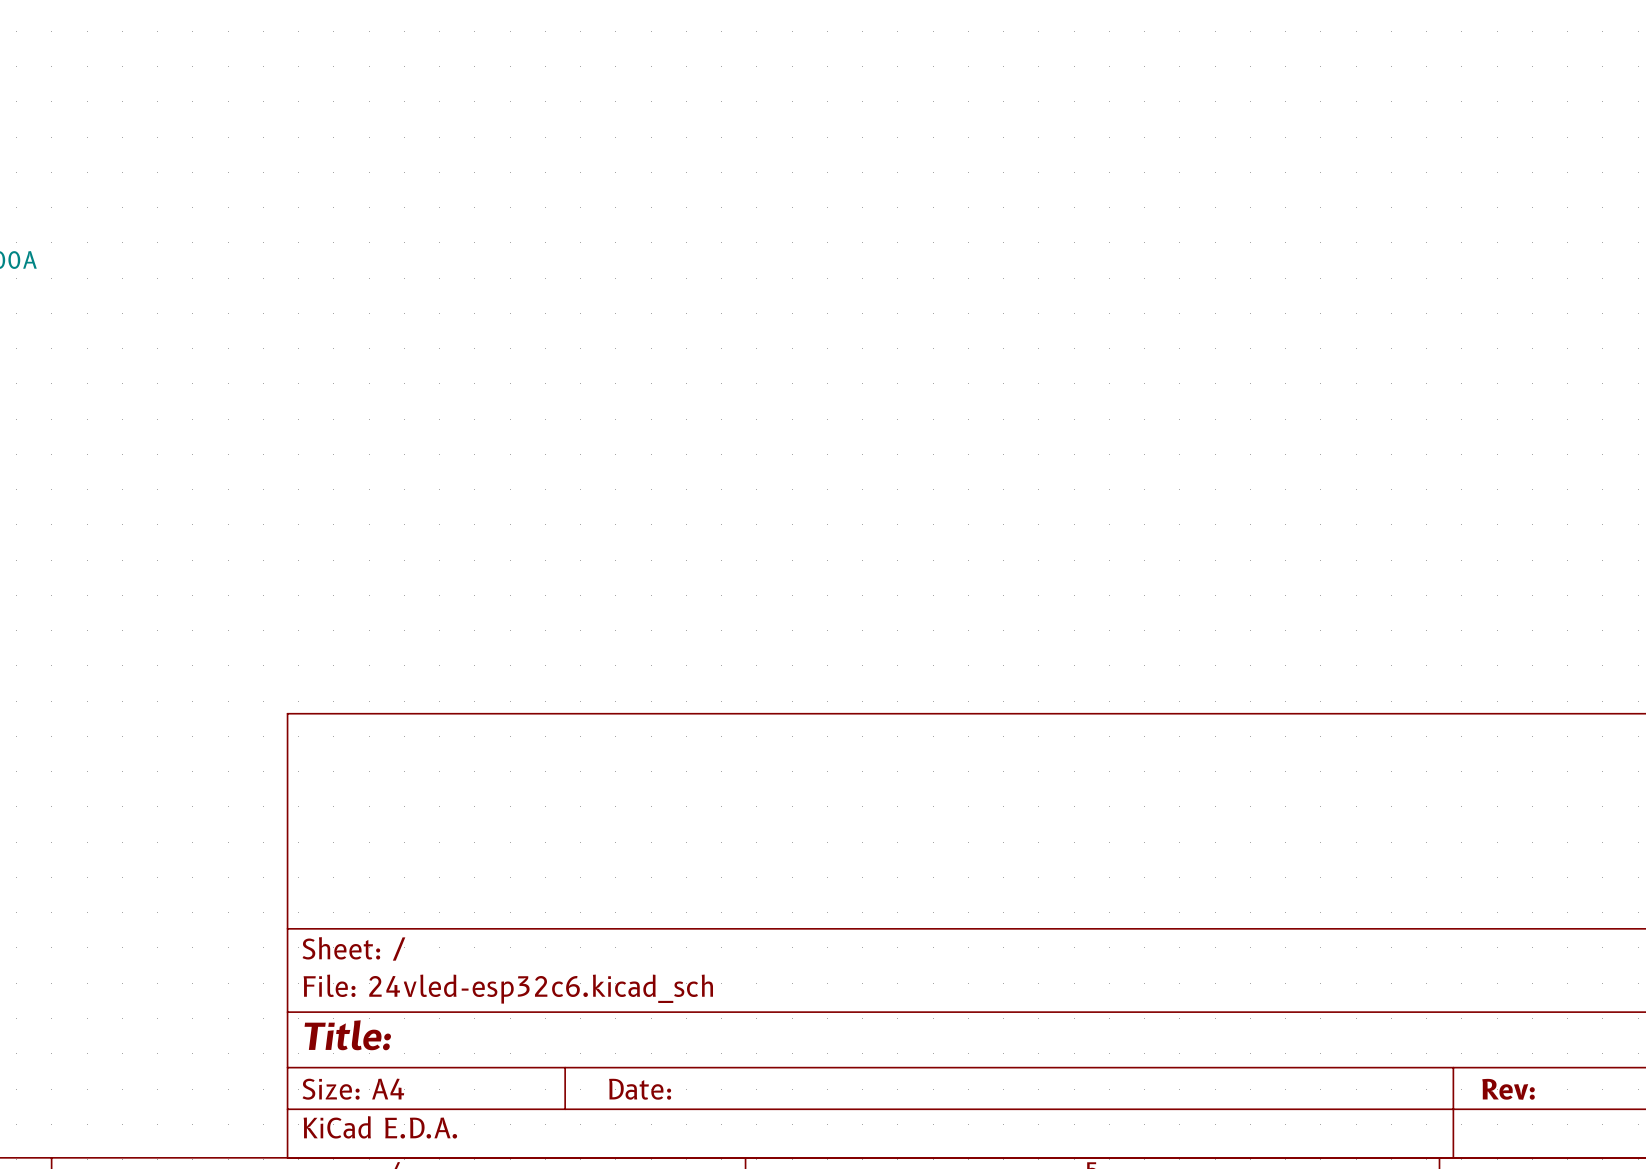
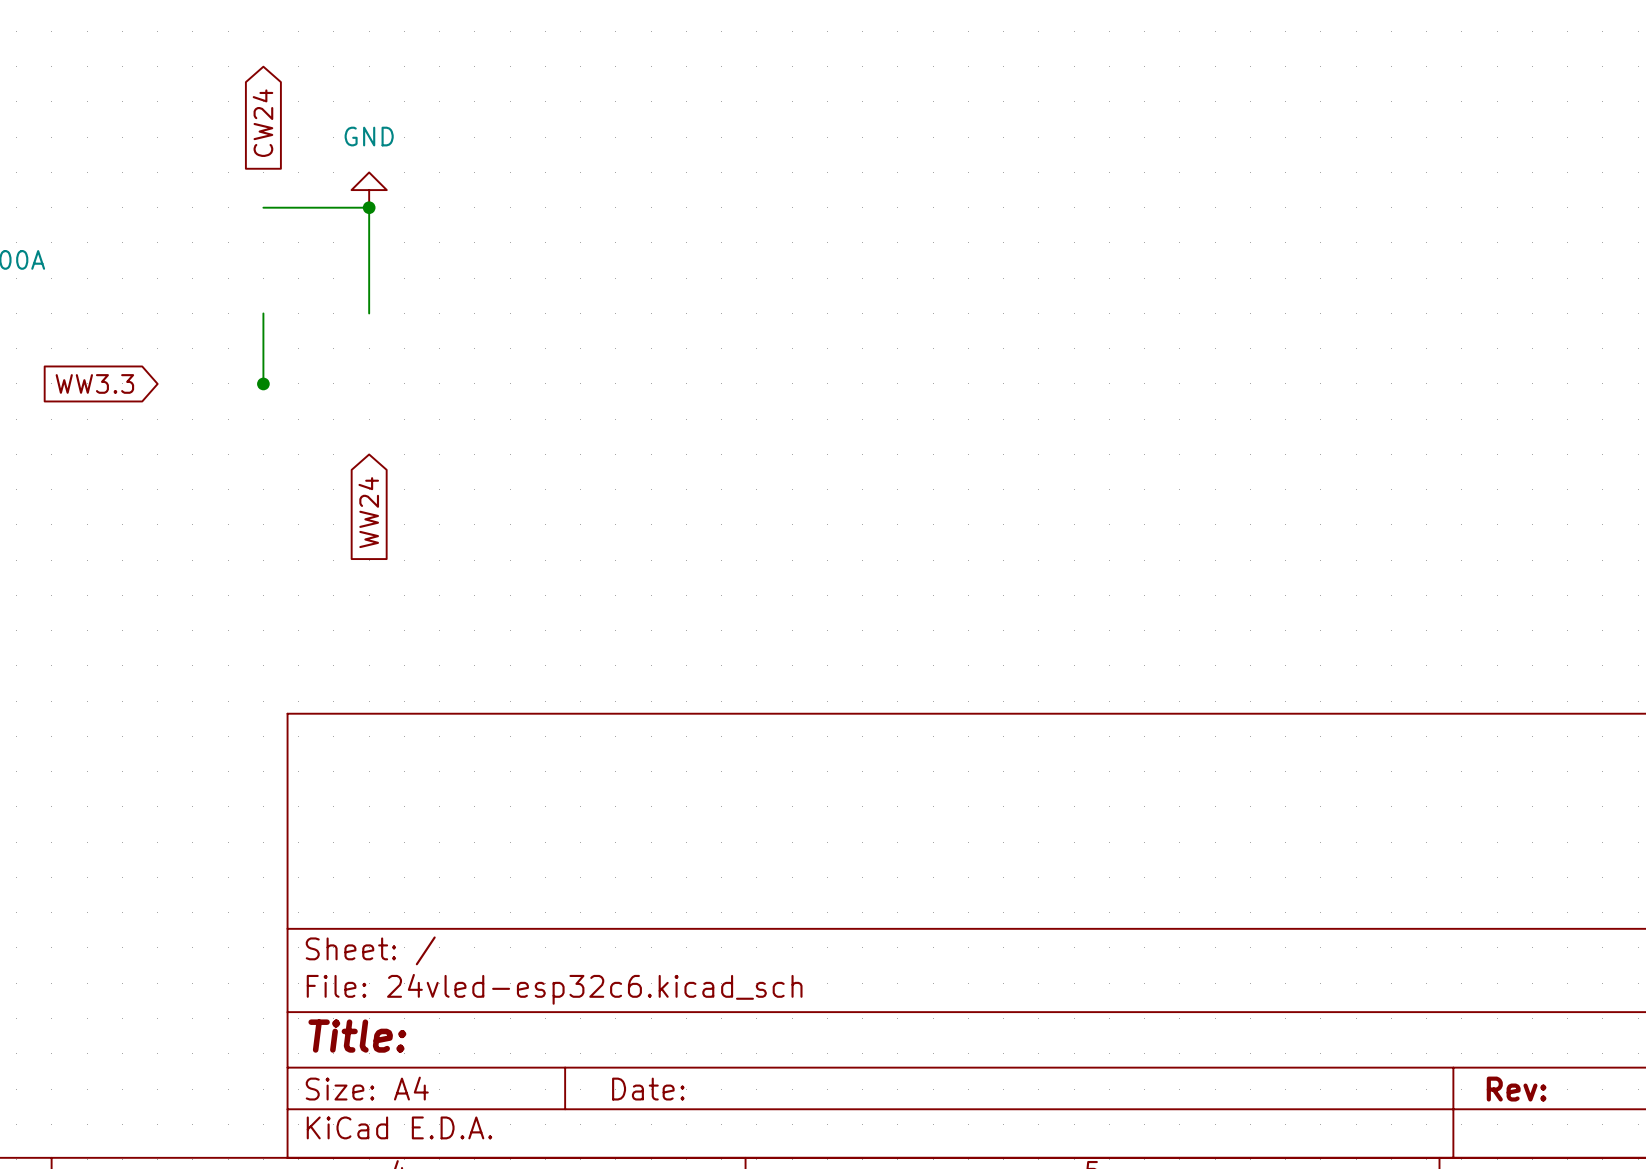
global label: none -> CW24 (262, 123)
power symbol: none -> GND (369, 190)
wire: none -> (263, 207) (369, 207) (369, 313)
junction: none -> (369, 207)
wire: none -> (263, 313) (263, 383)
junction: none -> (263, 383)
global label: none -> WW3.3 (94, 383)
global label: none -> WW24 (368, 512)

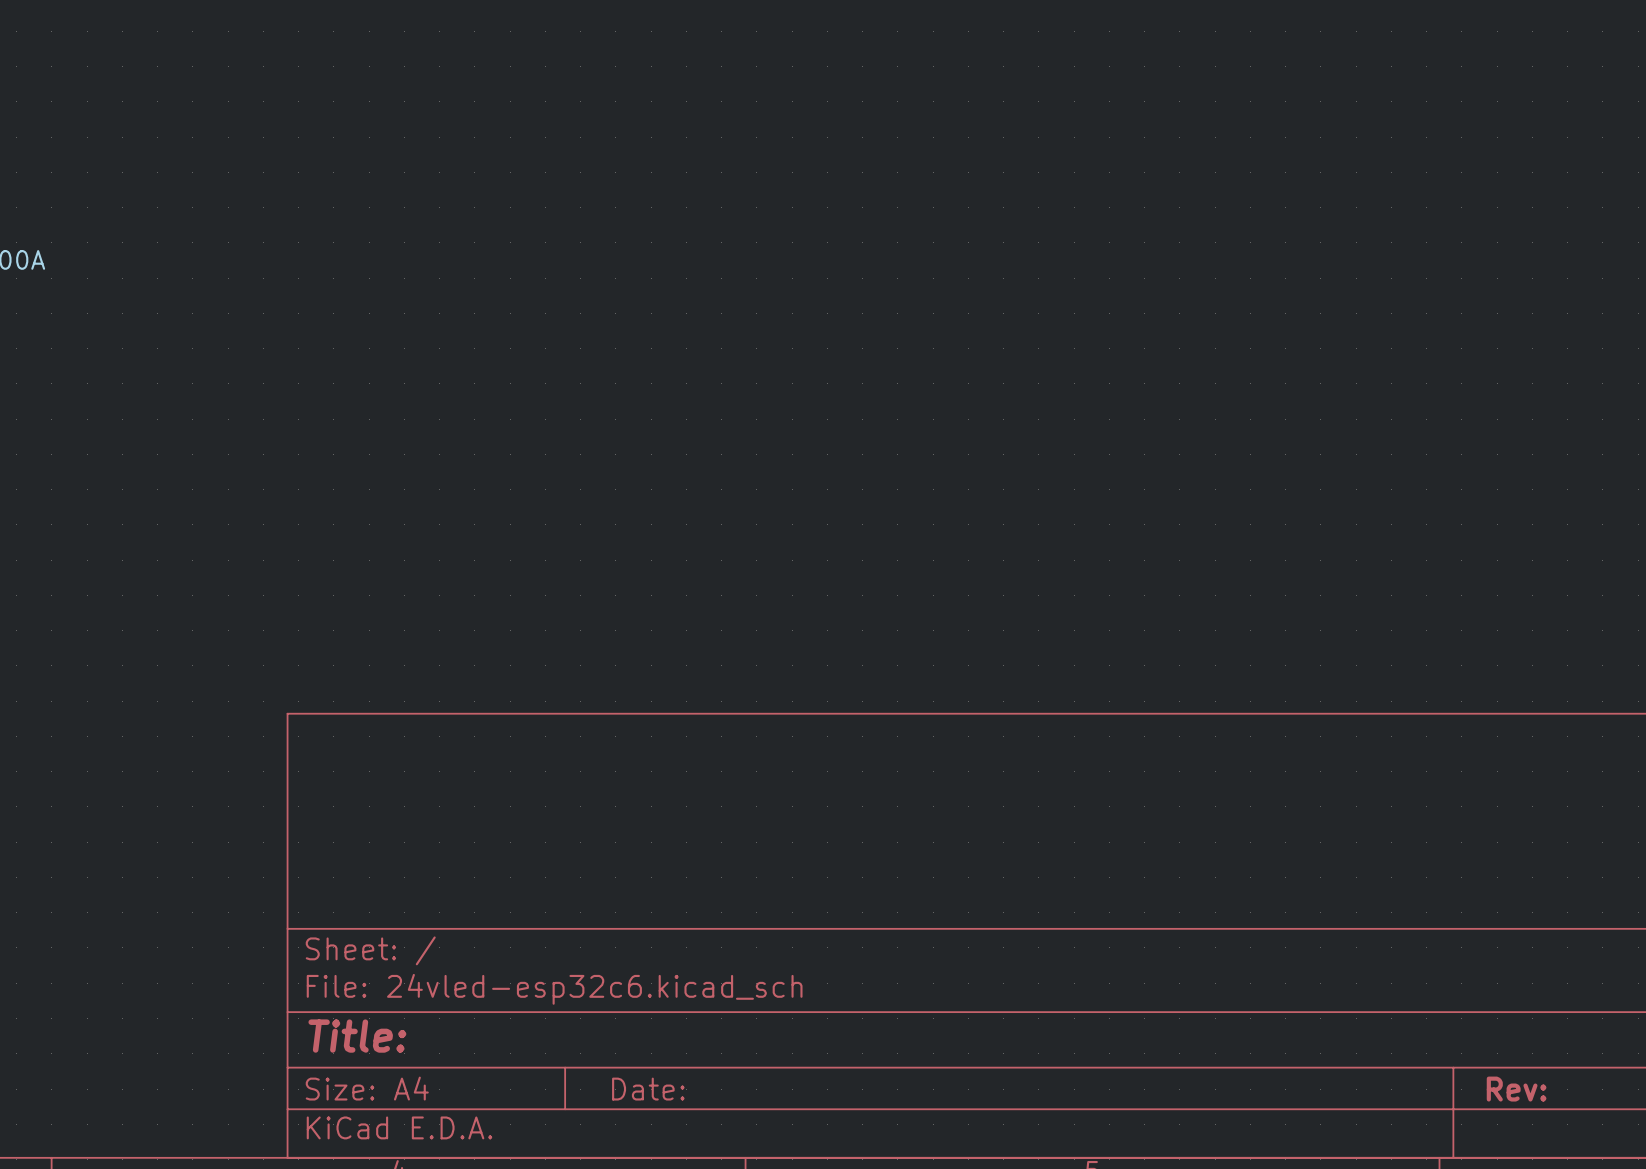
global label: CW24 (262, 123) -> none
power symbol: GND (369, 190) -> none
wire: (263, 207) (369, 207) (369, 313) -> none
junction: (369, 207) -> none
wire: (263, 313) (263, 383) -> none
global label: WW3.3 (94, 383) -> none
junction: (263, 383) -> none
global label: WW24 (368, 512) -> none

